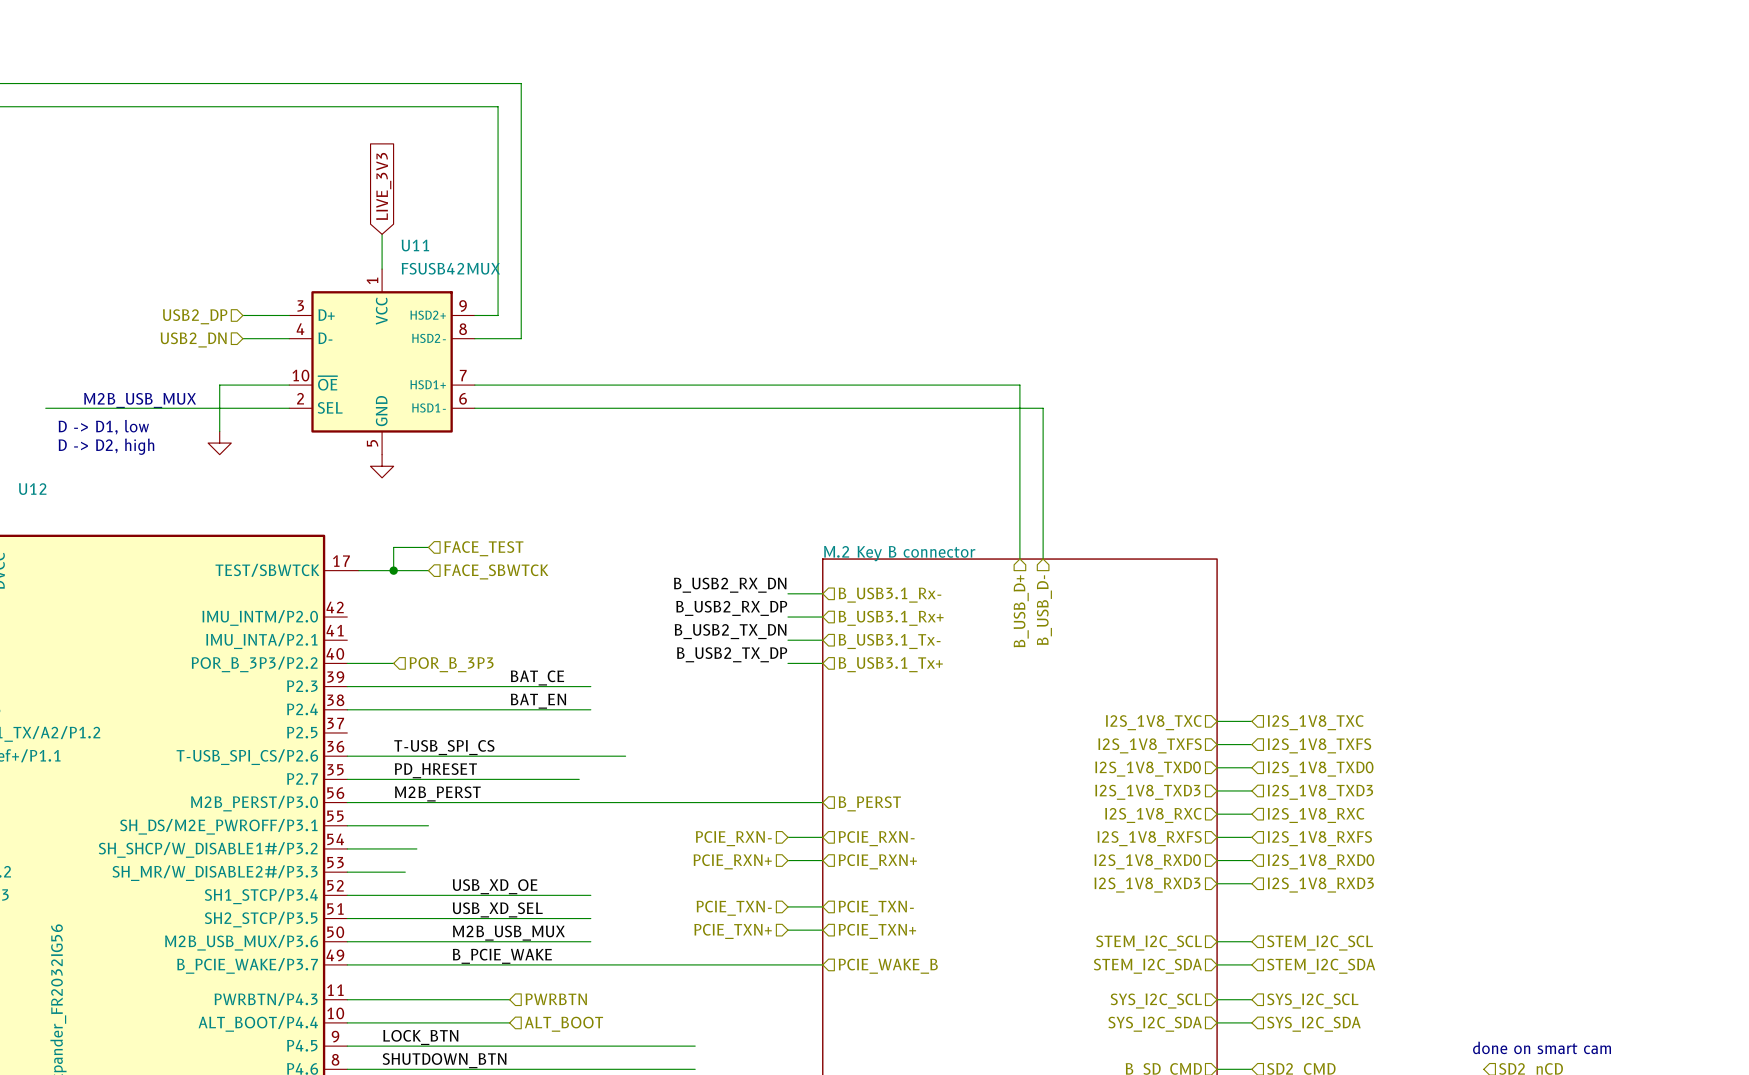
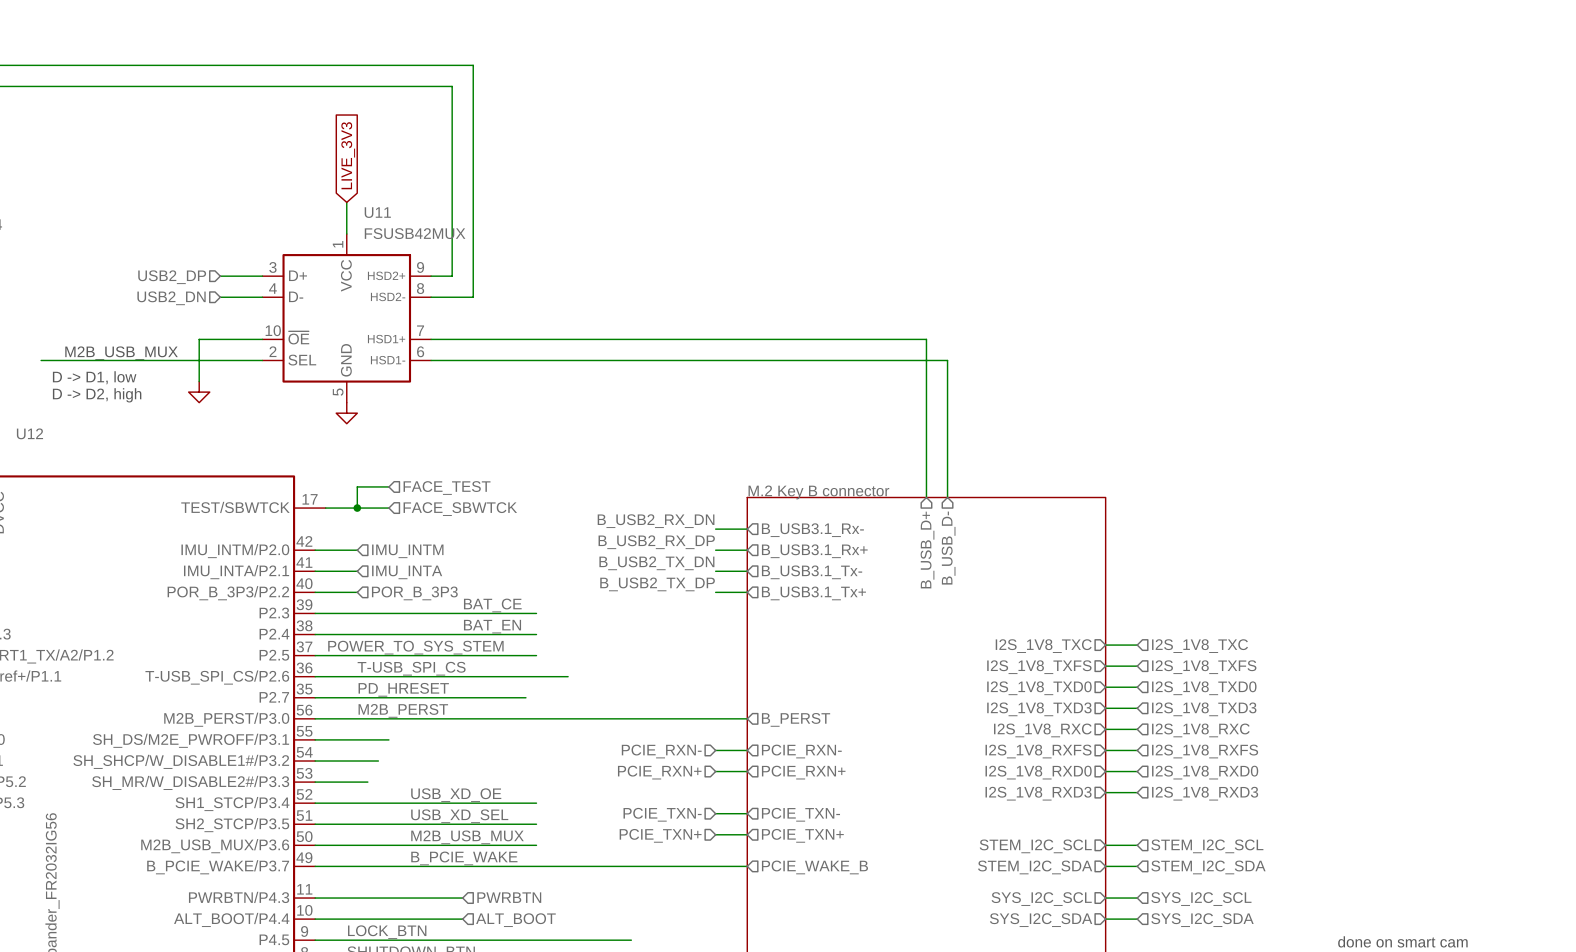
wire: none -> (315, 550) (357, 550)
hierarchical label: none -> IMU_INTM (407, 551)
wire: none -> (315, 571) (357, 571)
hierarchical label: none -> IMU_INTA (407, 572)
label: none -> POWER_TO_SYS_STEM (415, 647)
wire: none -> (315, 655) (536, 655)

